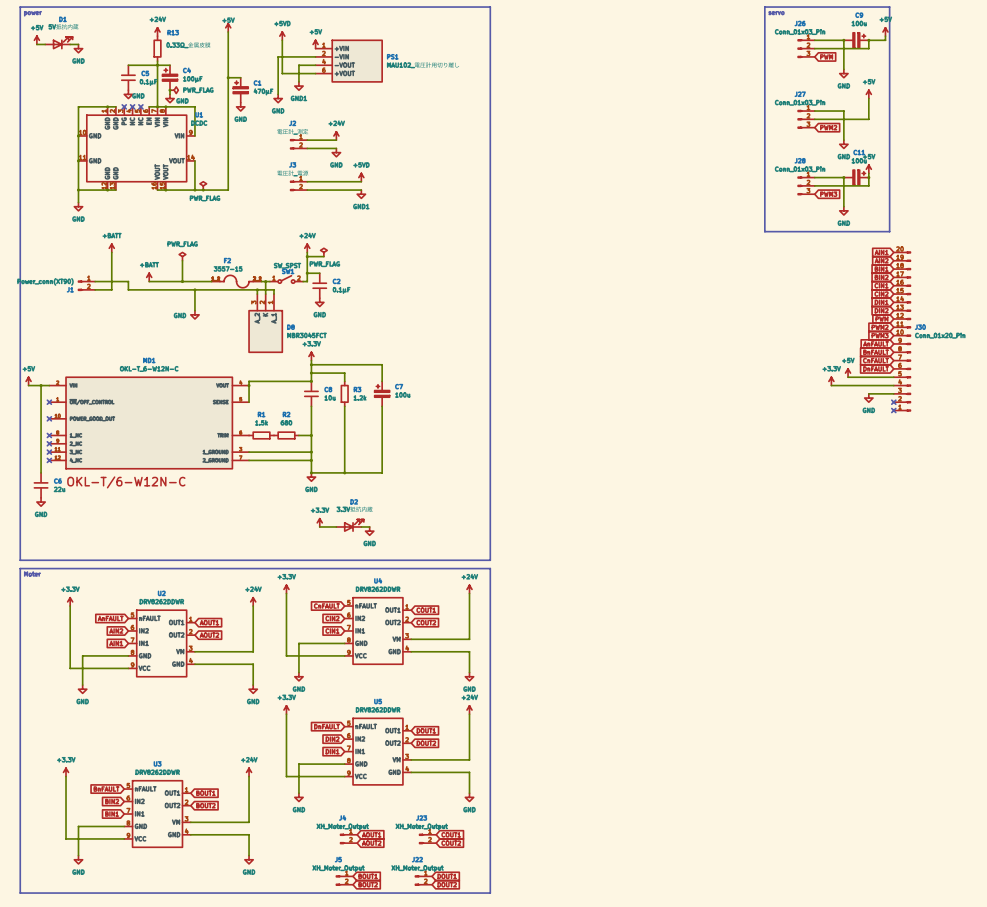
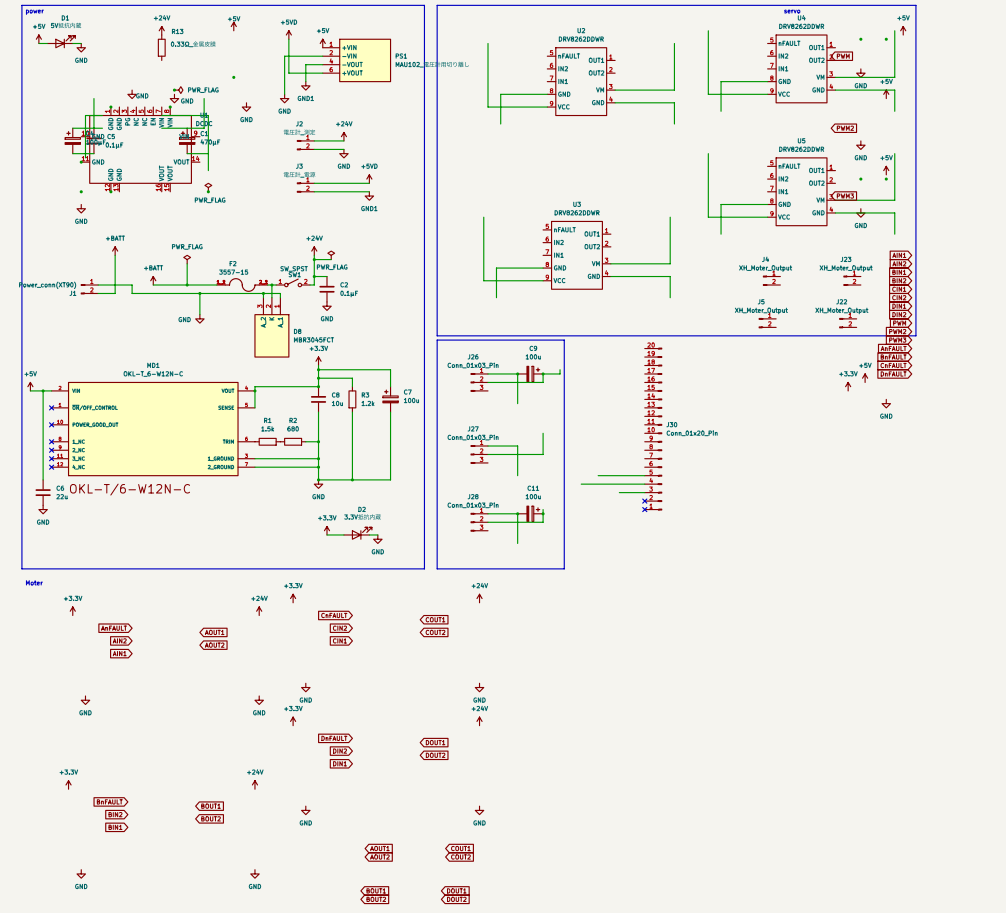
line: (415, 7) (427, 7) -> (424, 5) (424, 568)
line: (490, 7) (490, 560) -> (500, 5) (780, 5)
line: (764, 7) (764, 231) (889, 231) (889, 7) -> (437, 5) (437, 335) (915, 335) (915, 5) (907, 5)
wire: (228, 31) (228, 190) (157, 190) -> none
wire: none -> (708, 30) (708, 94) (767, 94)
wire: none -> (894, 30) (894, 77) (835, 77)
wire: (885, 36) (885, 40) (868, 40) (868, 48) (814, 48) -> none
wire: (814, 40) (843, 40) (843, 69) -> none
part position: (856, 40) -> (530, 373)
wire: none -> (488, 43) (488, 107) (547, 107)
wire: none -> (674, 43) (674, 90) (615, 90)
part position: (806, 48) -> (479, 382)
wire: (157, 61) (157, 106) -> none
wire: (128, 65) (170, 65) -> none
part position: (128, 77) -> (93, 140)
part position: (170, 77) -> (72, 140)
wire: (228, 77) (240, 77) -> none
wire: none -> (767, 81) (721, 81) (721, 111)
part position: (240, 90) -> (187, 140)
wire: none -> (835, 90) (894, 90) (894, 111)
wire: none -> (547, 94) (500, 94) (500, 123)
wire: none -> (93, 98) (93, 128)
wire: none -> (204, 98) (204, 128) (161, 128)
wire: (868, 98) (868, 119) (814, 119) -> none
wire: none -> (615, 102) (674, 102) (674, 123)
wire: (115, 106) (78, 106) (78, 202) -> none
no-connect mark: (124, 106) -> none
no-connect mark: (132, 106) -> none
no-connect mark: (140, 106) -> none
wire: (149, 106) (194, 106) (194, 135) -> none
wire: (814, 111) (843, 111) (843, 140) -> none
wire: none -> (102, 115) (85, 115) (85, 157)
wire: none -> (161, 115) (208, 115) (208, 170)
part position: (806, 119) -> (479, 454)
wire: none -> (72, 128) (102, 128)
junction: (78, 135) -> none
wire: none -> (72, 153) (93, 153)
wire: none -> (187, 153) (208, 153)
wire: none -> (708, 153) (708, 217) (767, 217)
wire: none -> (894, 153) (894, 200) (835, 200)
wire: (194, 160) (194, 190) -> none
wire: (868, 173) (868, 185) (814, 185) -> none
wire: (814, 177) (843, 177) (843, 206) -> none
part position: (856, 177) -> (530, 513)
part position: (806, 185) -> (479, 522)
wire: (78, 190) (115, 190) -> none
wire: none -> (767, 204) (721, 204) (721, 234)
wire: none -> (835, 212) (894, 212) (894, 234)
wire: none -> (483, 217) (483, 280) (543, 280)
wire: none -> (670, 217) (670, 263) (610, 263)
wire: none -> (543, 268) (496, 268) (496, 297)
wire: none -> (610, 276) (670, 276) (670, 297)
part position: (902, 331) -> (653, 429)
wire: none -> (560, 369) (560, 373) (543, 373) (543, 382) (488, 382)
wire: none -> (488, 373) (517, 373) (517, 403)
junction: none -> (517, 373)
junction: none -> (543, 373)
wire: (848, 377) (893, 377) -> none
wire: (831, 385) (893, 385) -> none
wire: (868, 393) (893, 393) -> none
no-connect mark: (893, 402) -> none
no-connect mark: (893, 410) -> none
wire: none -> (543, 433) (543, 454) (488, 454)
wire: none -> (488, 446) (517, 446) (517, 475)
wire: none -> (598, 475) (644, 475)
wire: none -> (581, 484) (644, 484)
wire: none -> (619, 492) (644, 492)
no-connect mark: none -> (644, 501)
wire: none -> (543, 509) (543, 522) (488, 522)
no-connect mark: none -> (644, 509)
wire: none -> (488, 513) (517, 513) (517, 543)
junction: none -> (517, 513)
junction: none -> (543, 513)
line: (415, 560) (427, 560) -> (500, 568) (564, 568) (564, 340) (437, 340) (437, 568)
line: (20, 568) (20, 893) (490, 893) (490, 568) (20, 568) -> none
wire: (286, 593) (286, 655) (344, 655) -> none
wire: (469, 593) (469, 639) (411, 639) -> none
wire: (70, 606) (70, 668) (128, 668) -> none
wire: (253, 606) (253, 651) (194, 651) -> none
part position: (377, 630) -> (801, 68)
part position: (161, 643) -> (581, 81)
wire: (344, 643) (298, 643) (298, 672) -> none
wire: (411, 651) (469, 651) (469, 672) -> none
wire: (128, 655) (82, 655) (82, 685) -> none
wire: (194, 664) (253, 664) (253, 685) -> none
wire: (286, 714) (286, 776) (344, 776) -> none
wire: (469, 714) (469, 759) (411, 759) -> none
part position: (377, 751) -> (801, 191)
wire: (344, 764) (298, 764) (298, 793) -> none
wire: (411, 772) (469, 772) (469, 793) -> none
wire: (66, 776) (66, 838) (124, 838) -> none
wire: (249, 776) (249, 822) (190, 822) -> none
part position: (157, 814) -> (576, 255)
wire: (124, 826) (78, 826) (78, 855) -> none
wire: (190, 834) (249, 834) (249, 855) -> none
part position: (348, 838) -> (771, 280)
part position: (427, 838) -> (852, 280)
part position: (344, 880) -> (767, 323)
part position: (423, 880) -> (848, 323)

